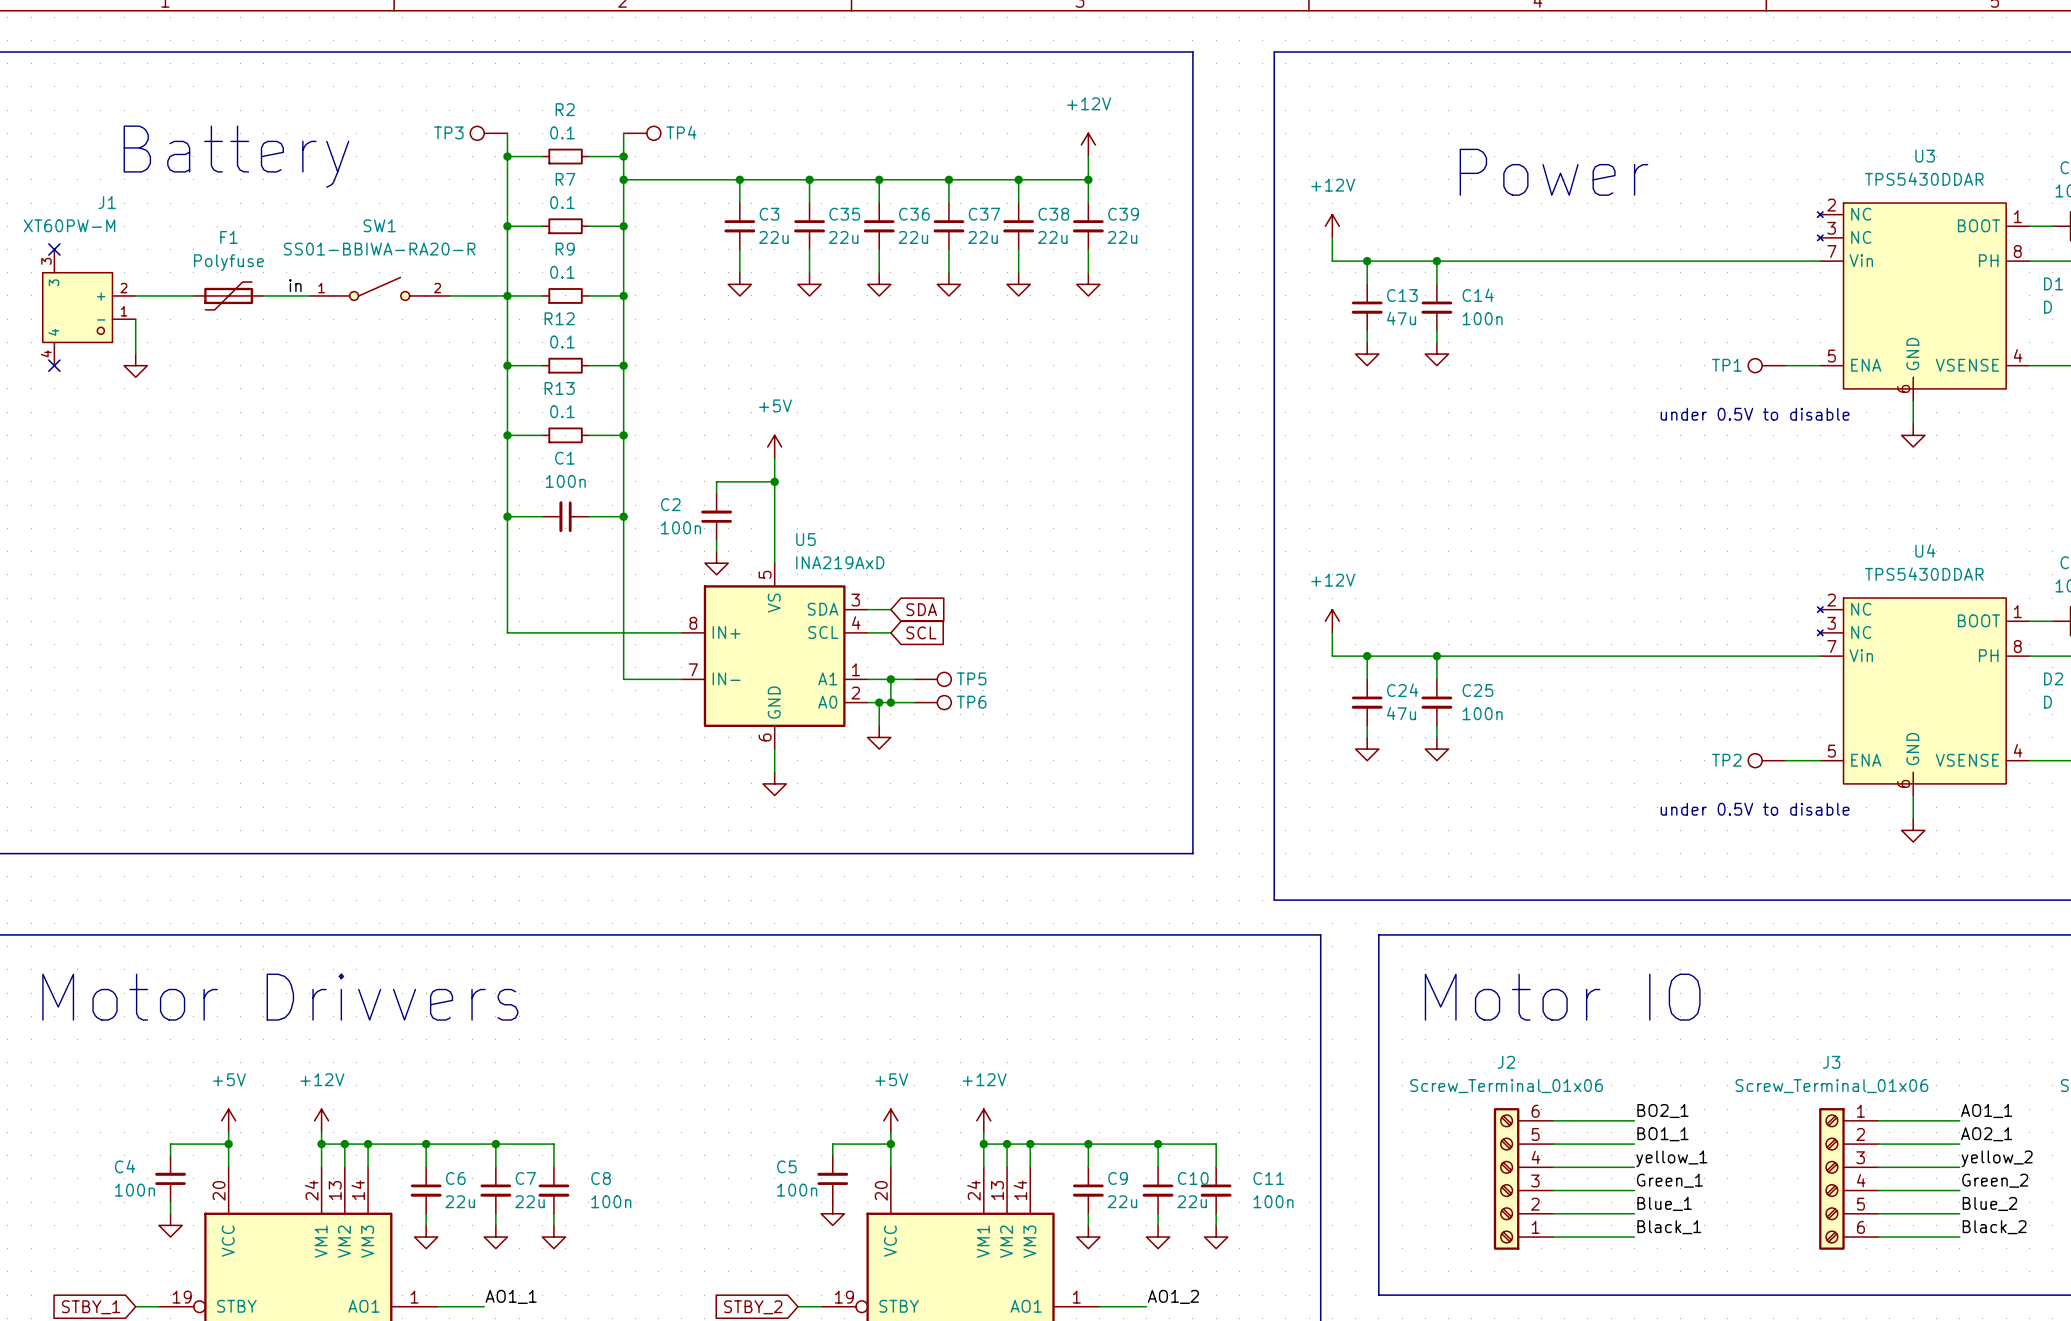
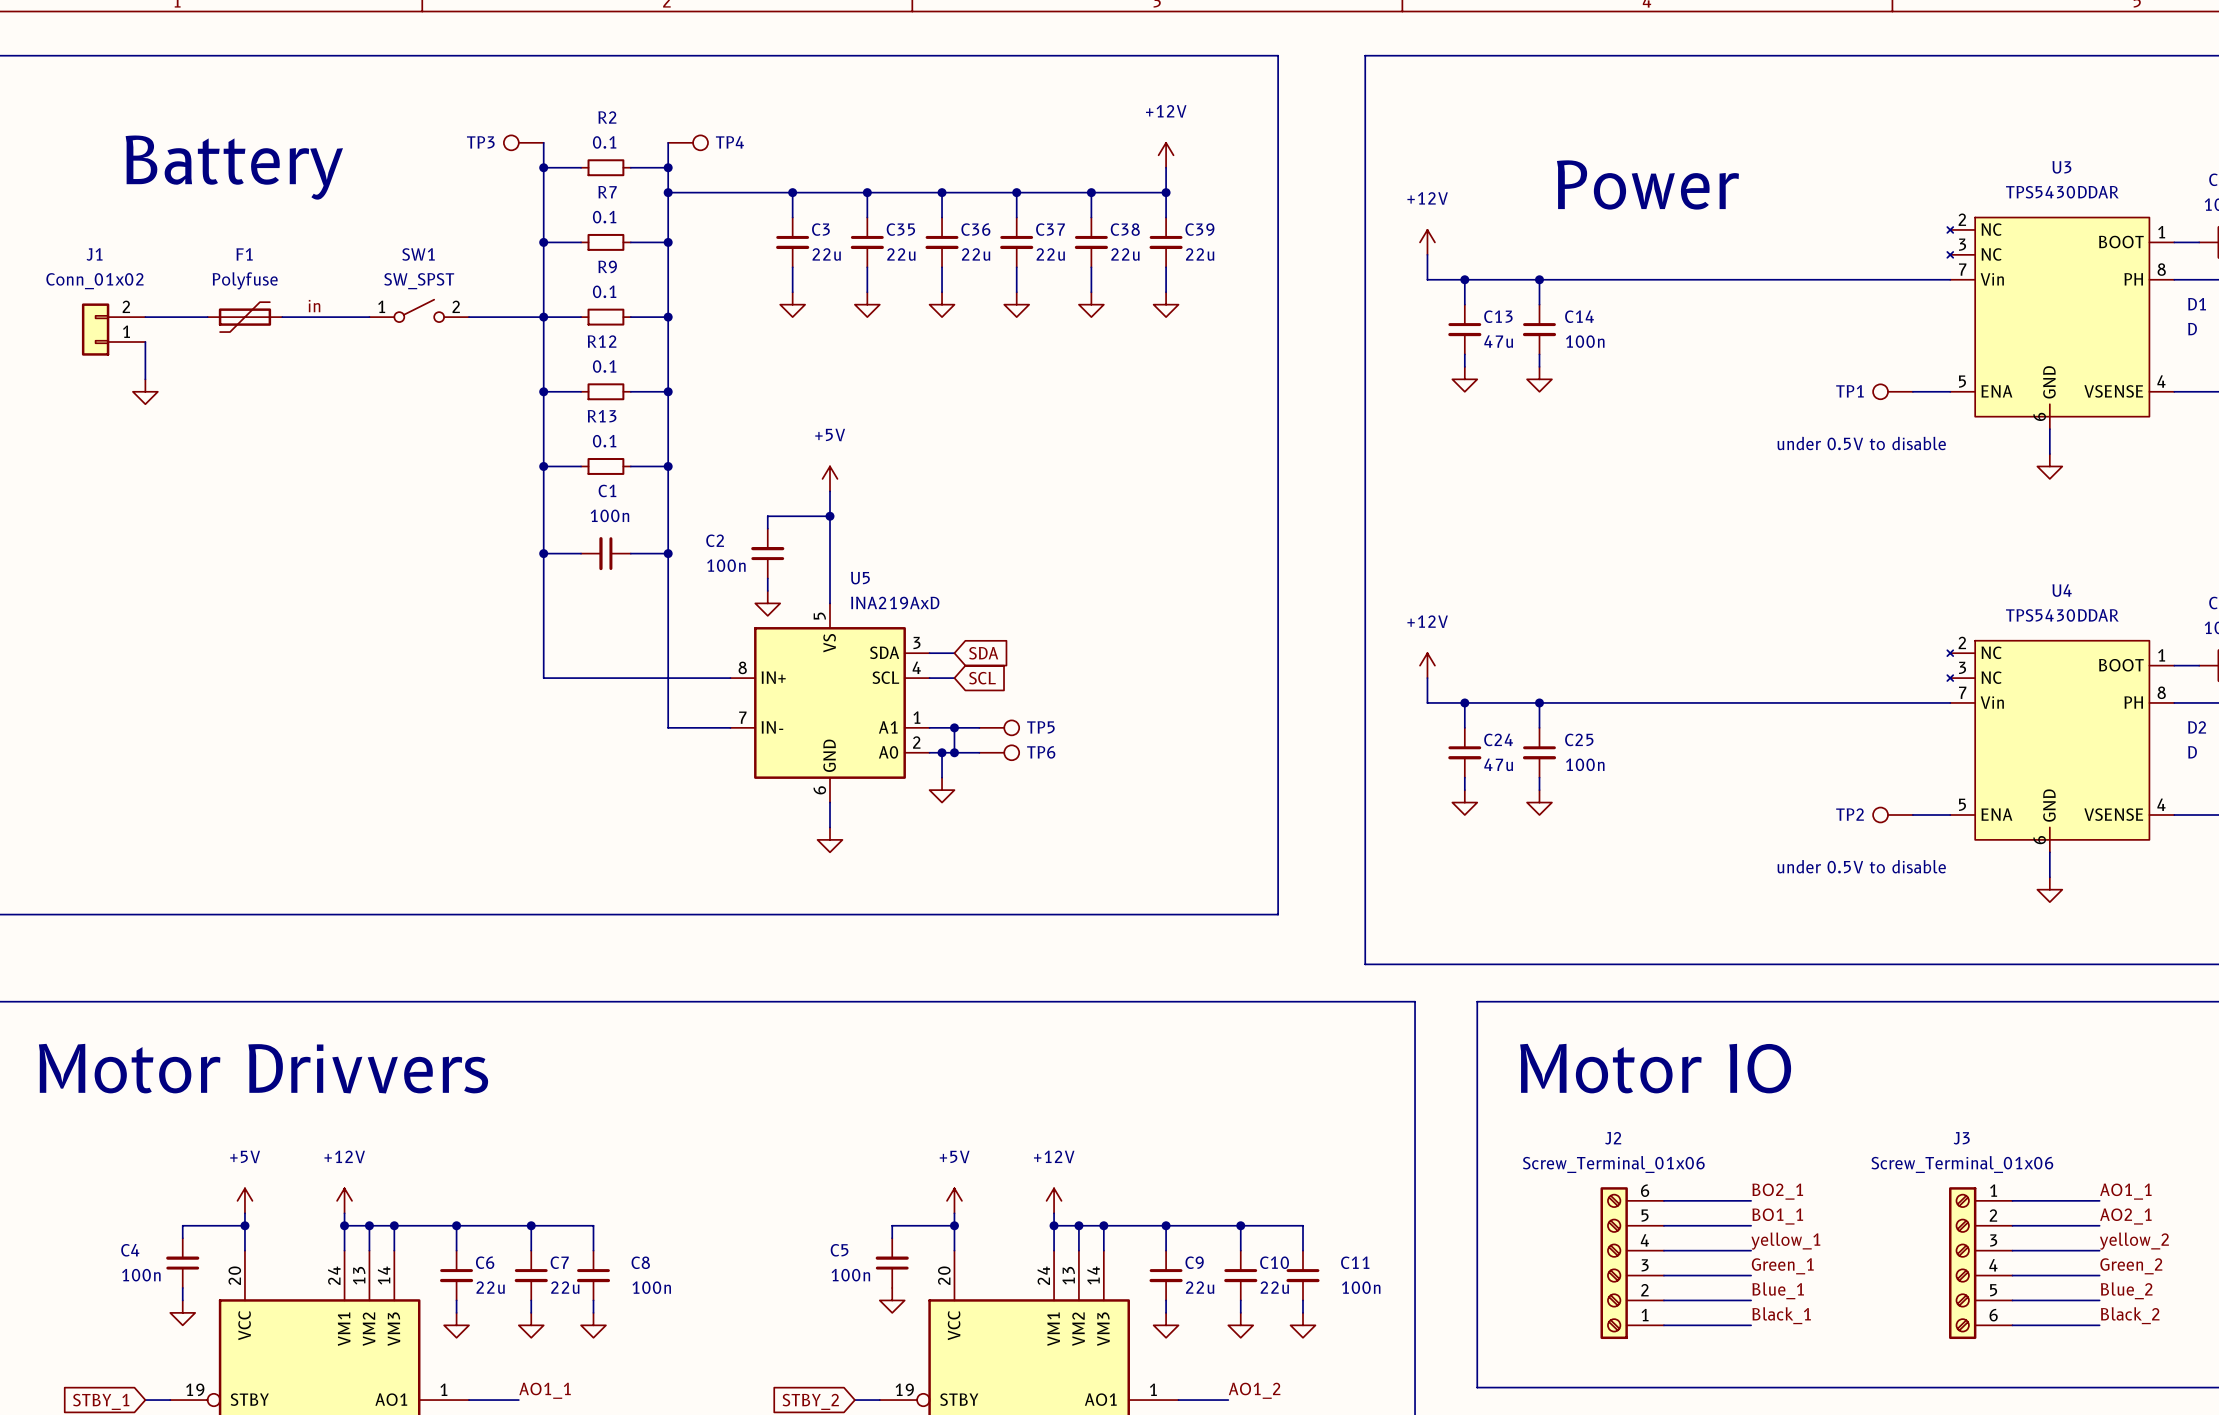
J1 name position: J1 (107, 202) -> J1 (94, 254)
J1 value: XT60PW-M (69, 225) -> Conn_01x02 (94, 281)
J1 symbol: [42, 249, 136, 366] -> [81, 303, 146, 356]
no-connect mark: (54, 249) -> none
SW1 value: SS01-BBIWA-RA20-R (379, 249) -> SW_SPST (419, 281)
SW1 symbol: [309, 277, 450, 301] -> [369, 299, 470, 323]
no-connect mark: (54, 365) -> none

